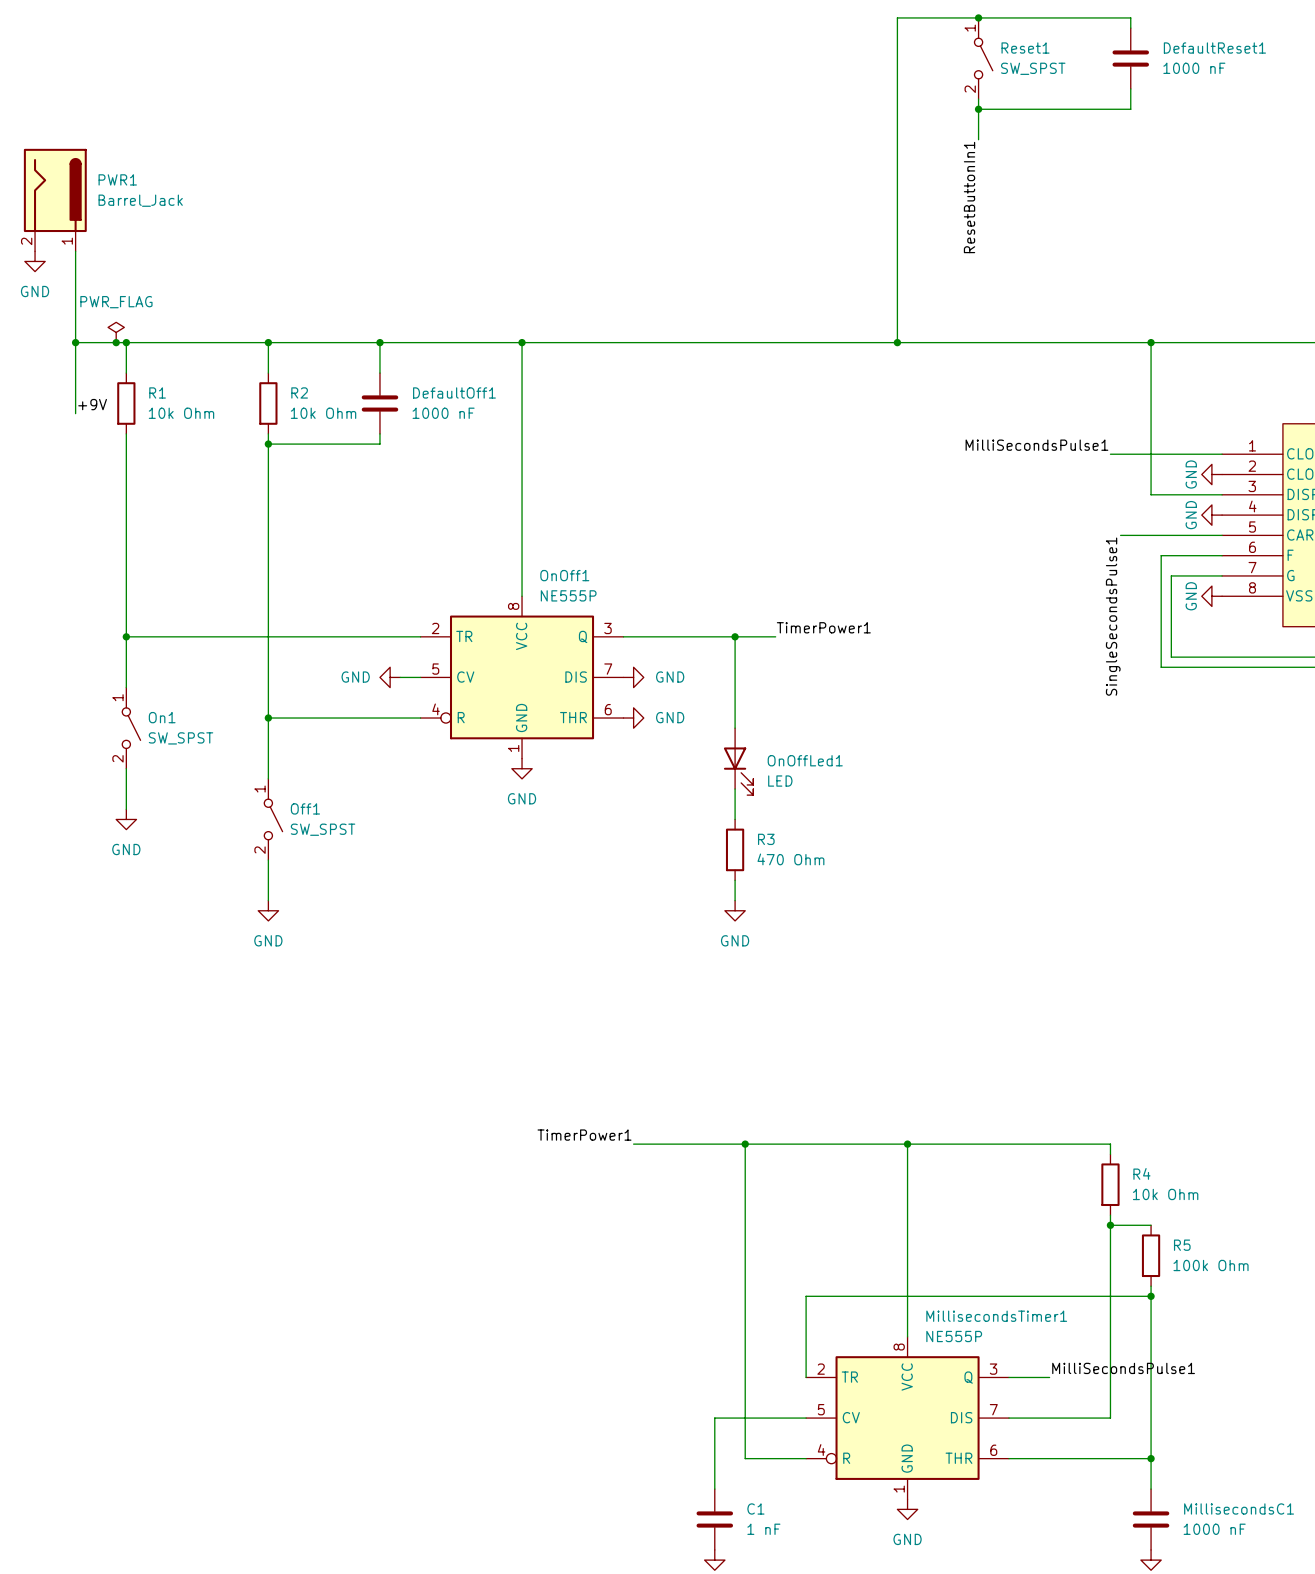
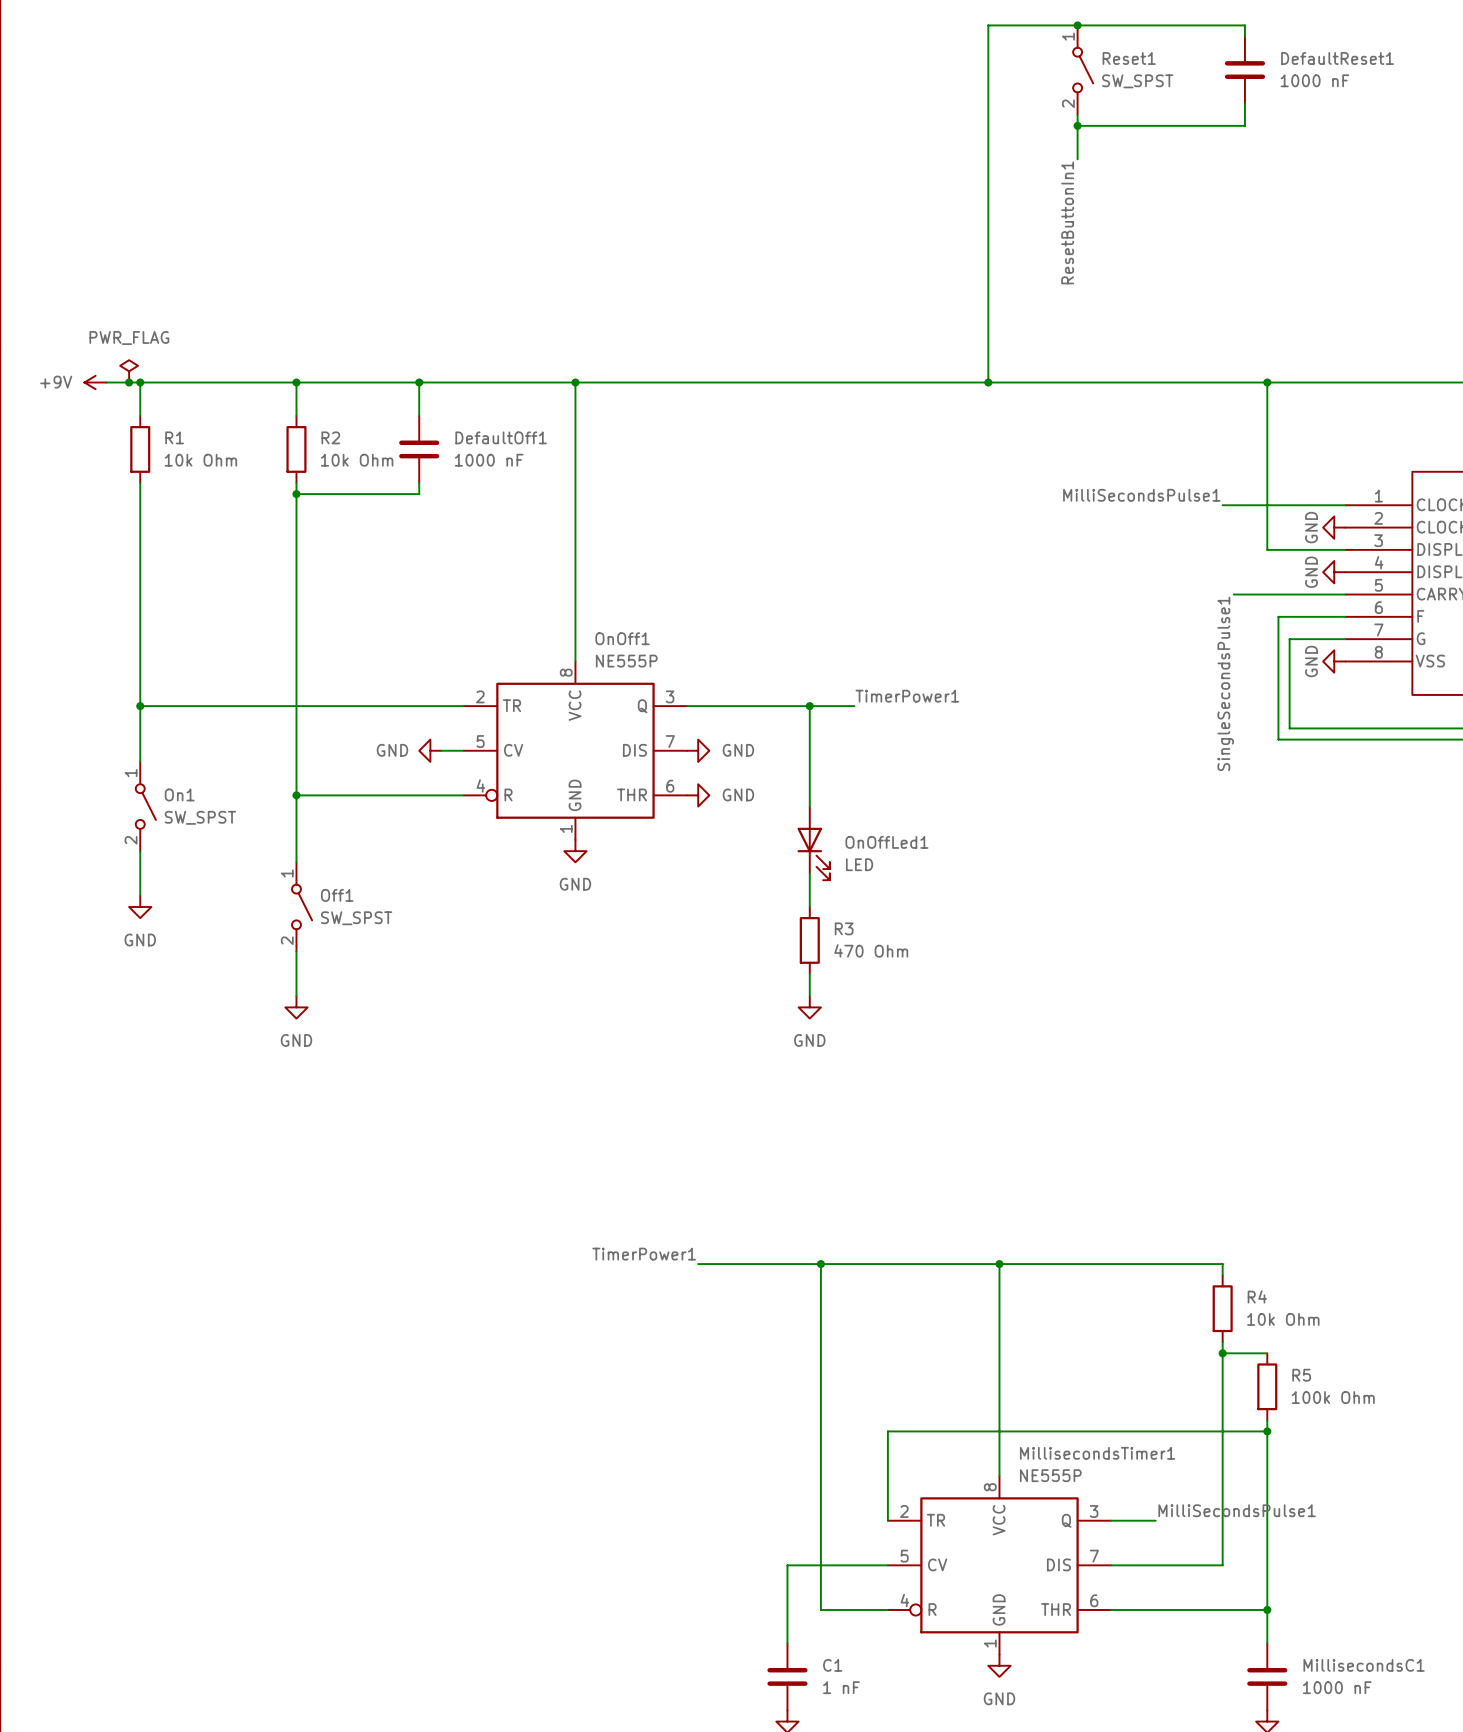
PWR1: Barrel_Jack (55, 200) -> none
wire: (75, 251) (75, 413) -> none
power symbol: GND (35, 261) -> none
junction: (75, 342) -> none
power symbol: none -> +9V (95, 382)
label: +9V (92, 404) -> none

